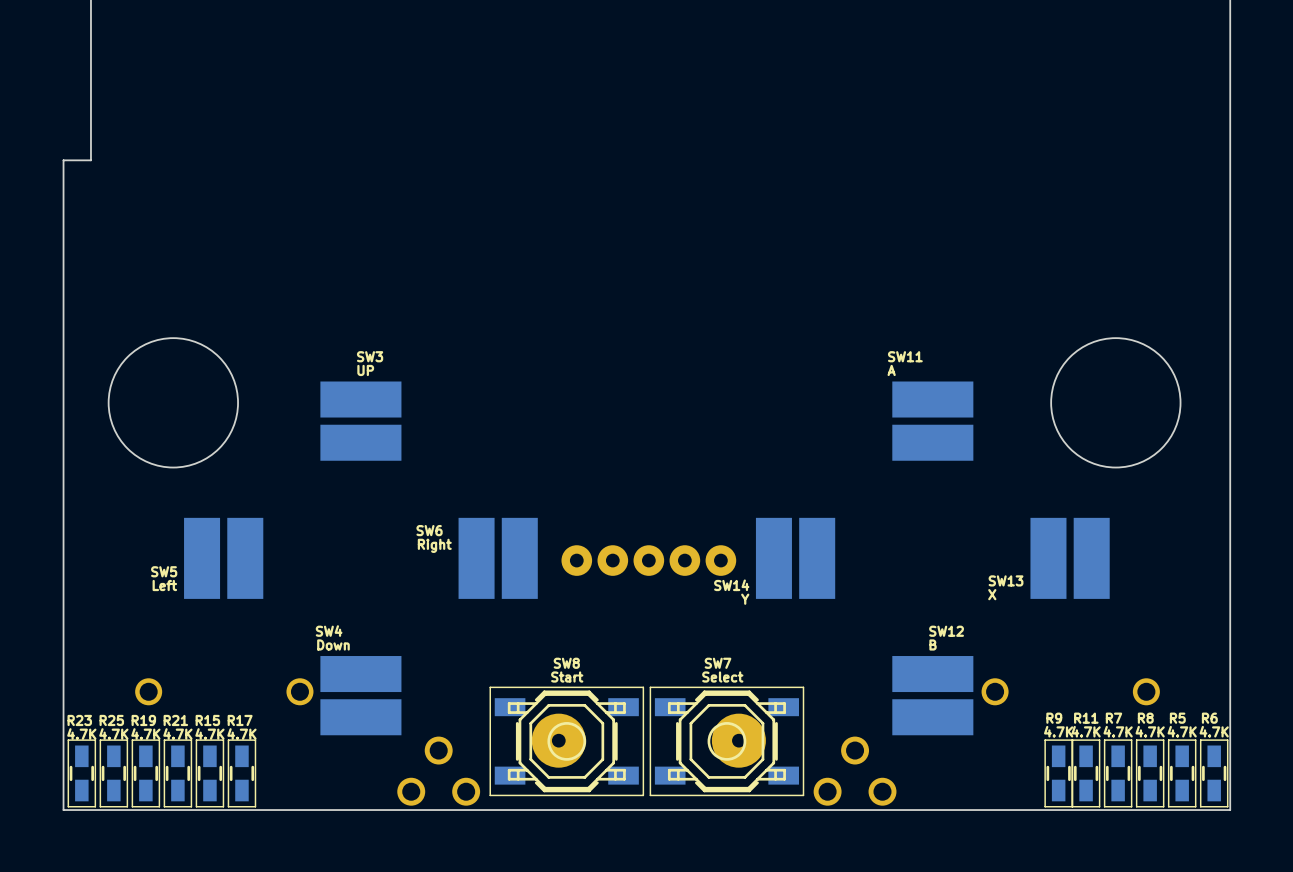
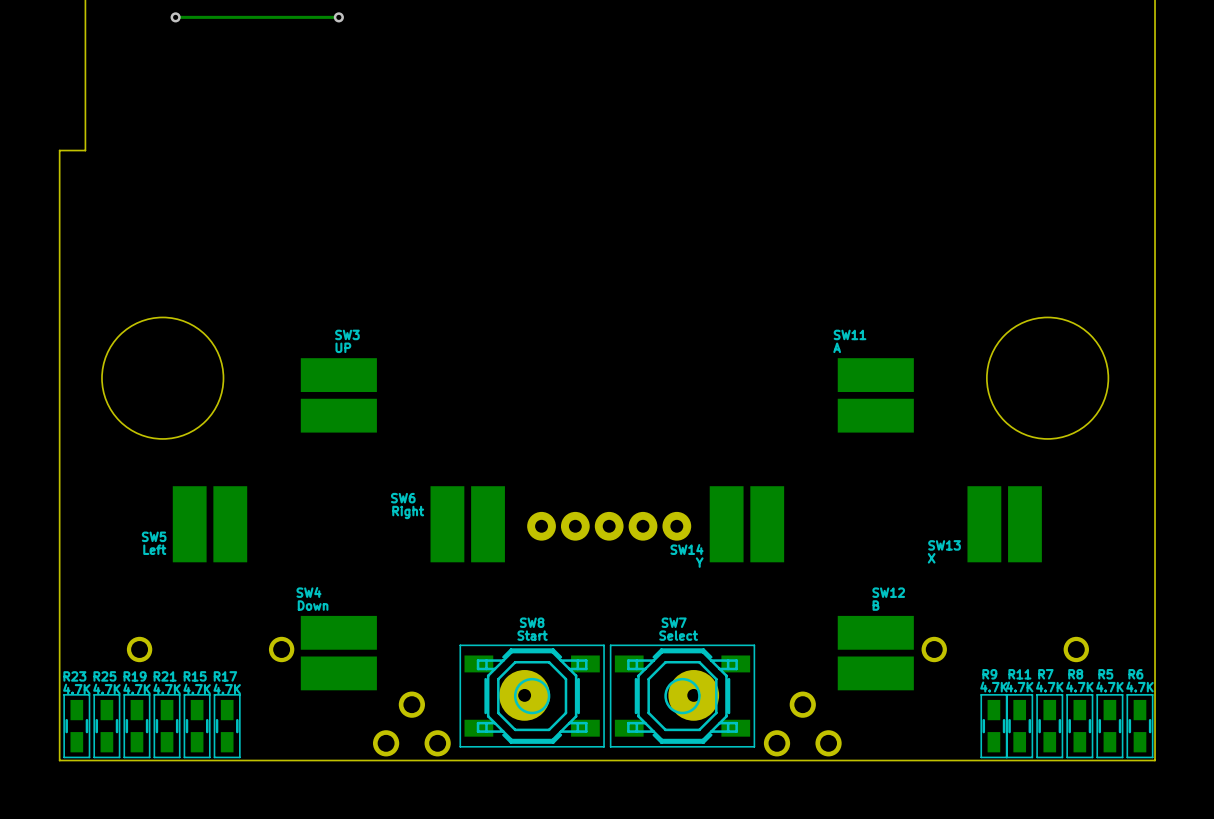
via: none -> (175, 17)
track: none -> (338, 17) (175, 17)
via: none -> (338, 17)

